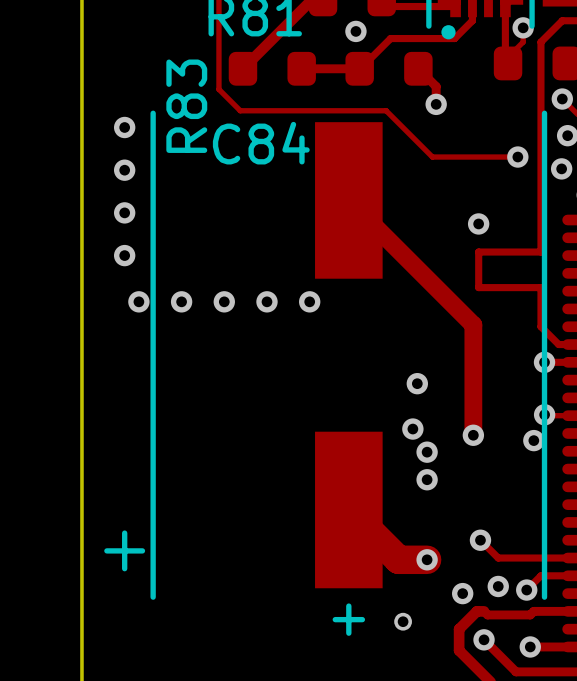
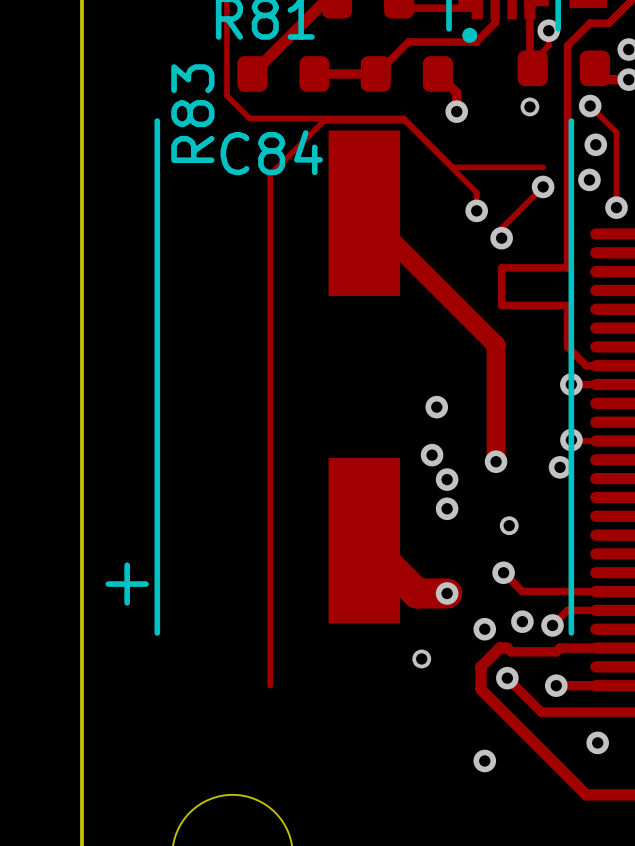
via: (355, 31) -> none
via: none -> (529, 106)
via: (124, 127) -> none
via position: (517, 157) -> (543, 186)
via: (124, 170) -> none
track: none -> (543, 186) (497, 232)
track: none -> (476, 210) (476, 192) (404, 120) (324, 120) (270, 174) (270, 685)
via: none -> (476, 210)
via: (124, 212) -> none
via: (124, 255) -> none
via: (138, 301) -> none
via: (181, 301) -> none
via: (224, 301) -> none
via: (266, 301) -> none
via: (309, 301) -> none
via: none -> (509, 525)
text: + (348, 619) -> none

